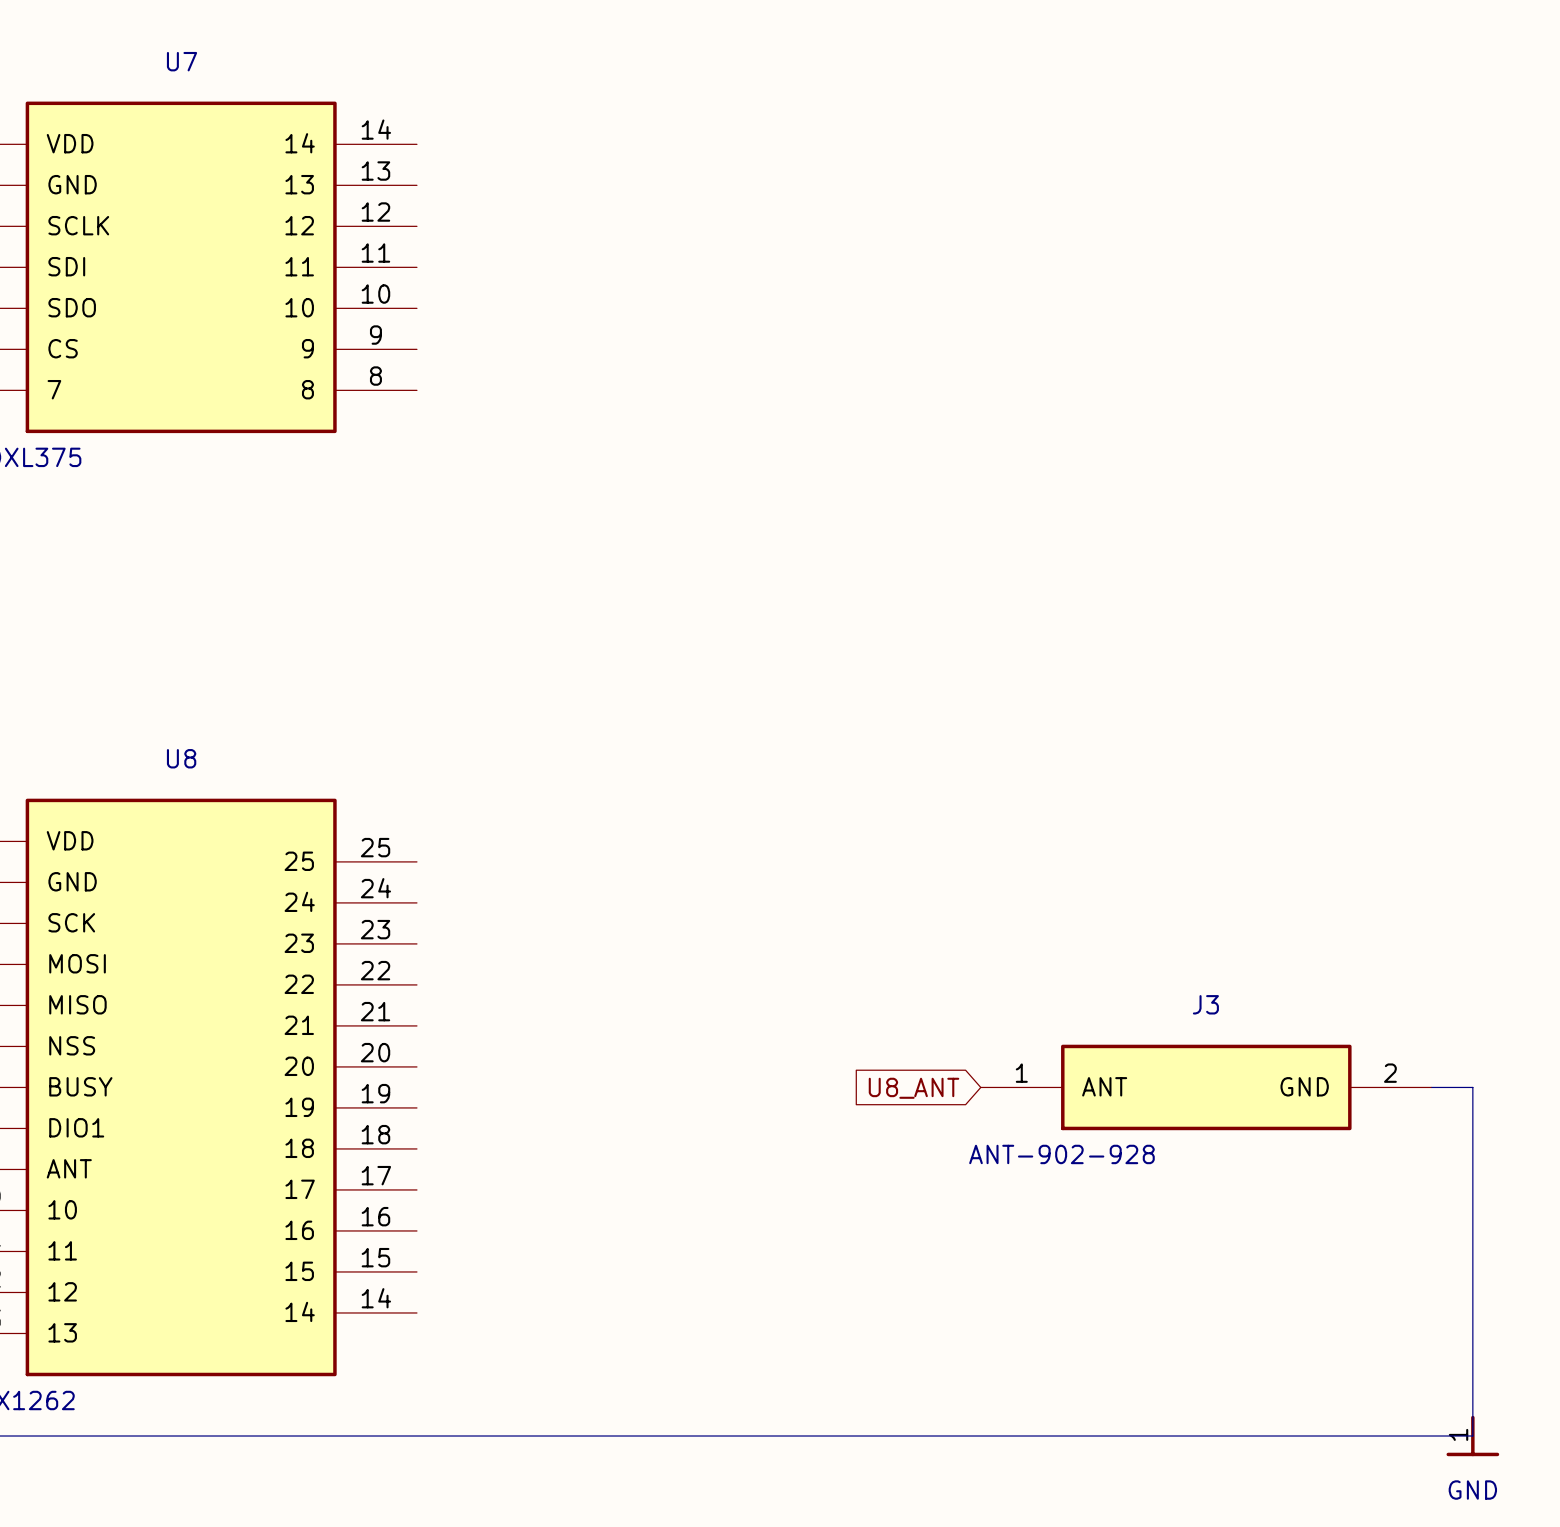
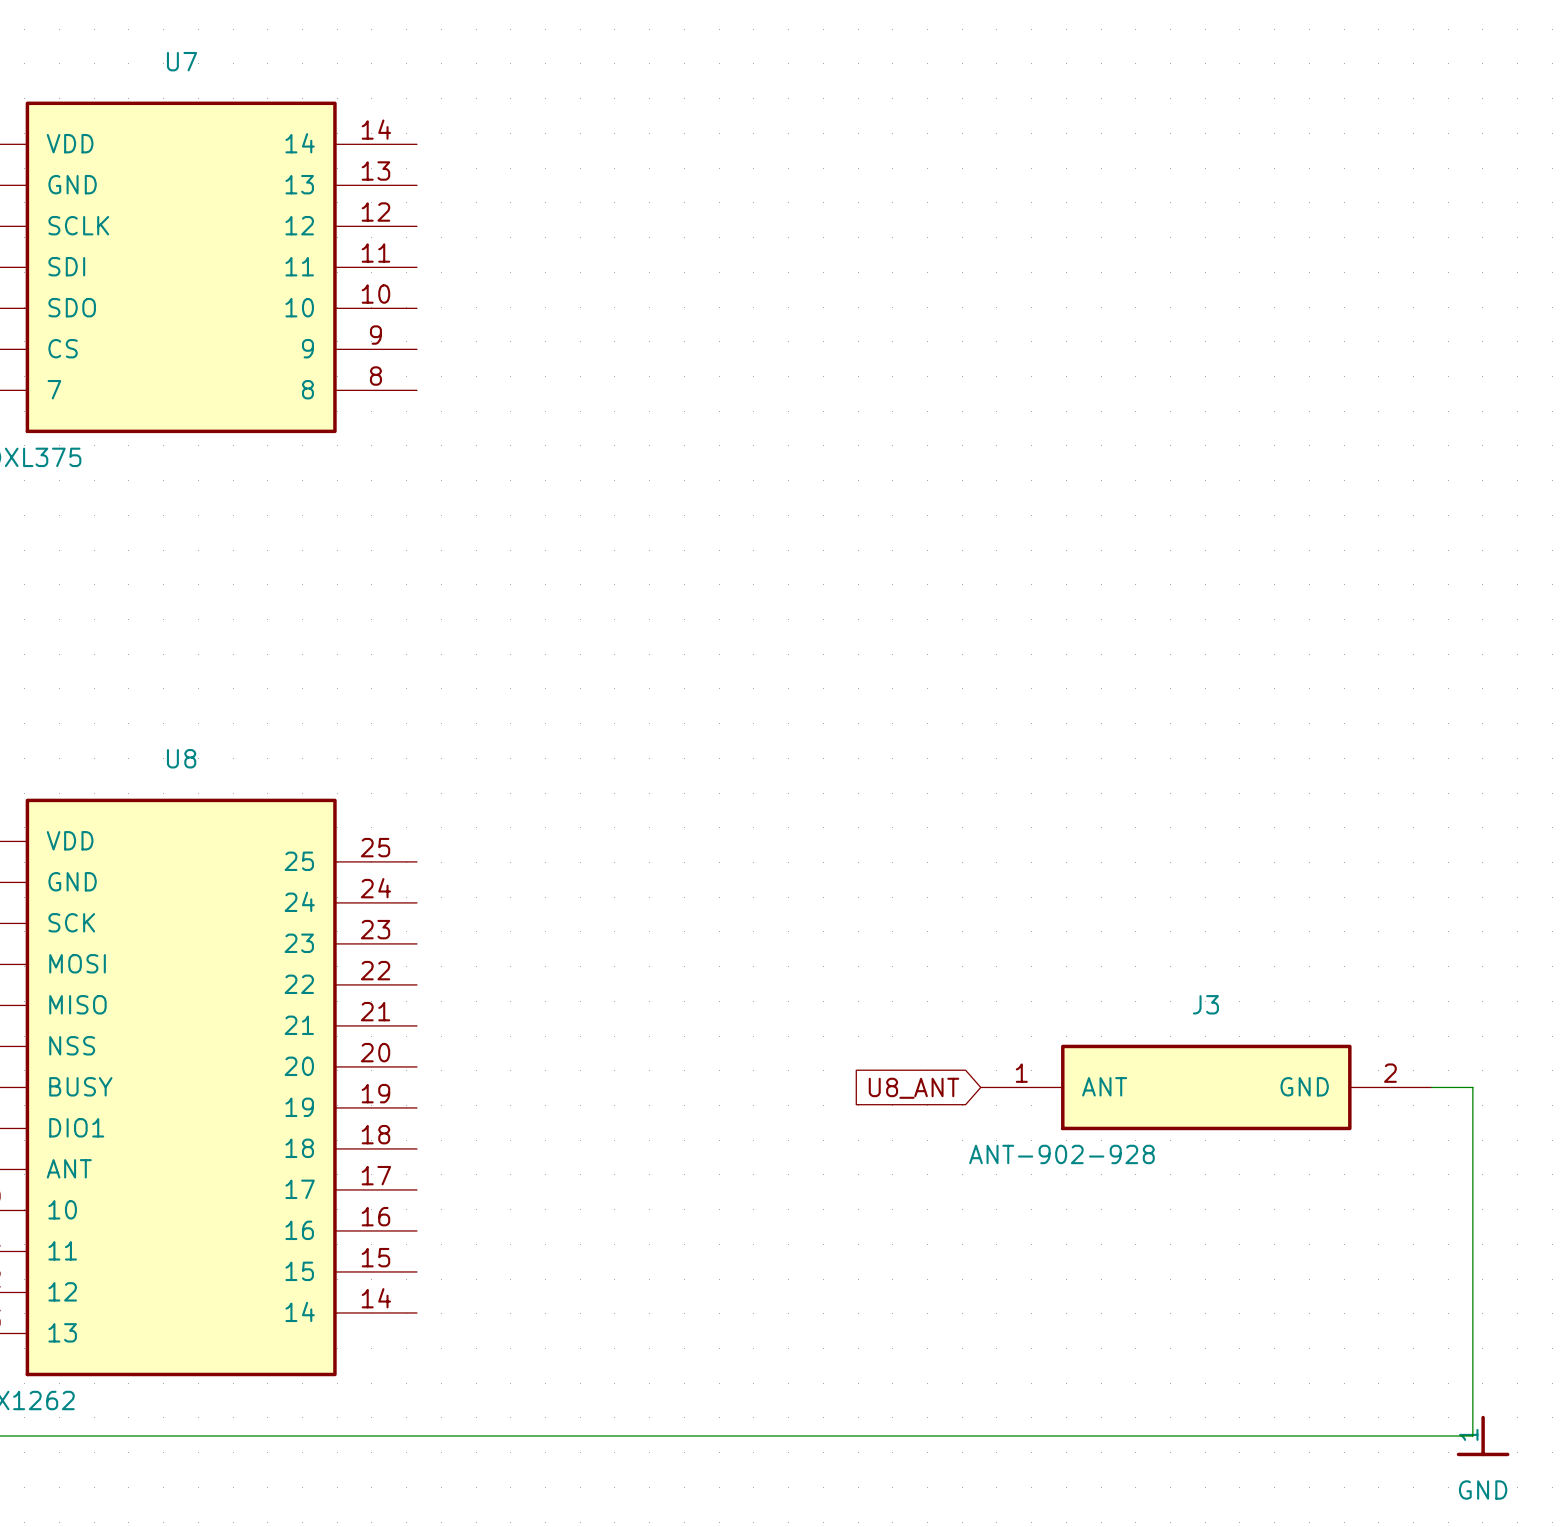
GND symbol: [1446, 1415, 1500, 1457] -> [1456, 1415, 1510, 1457]

